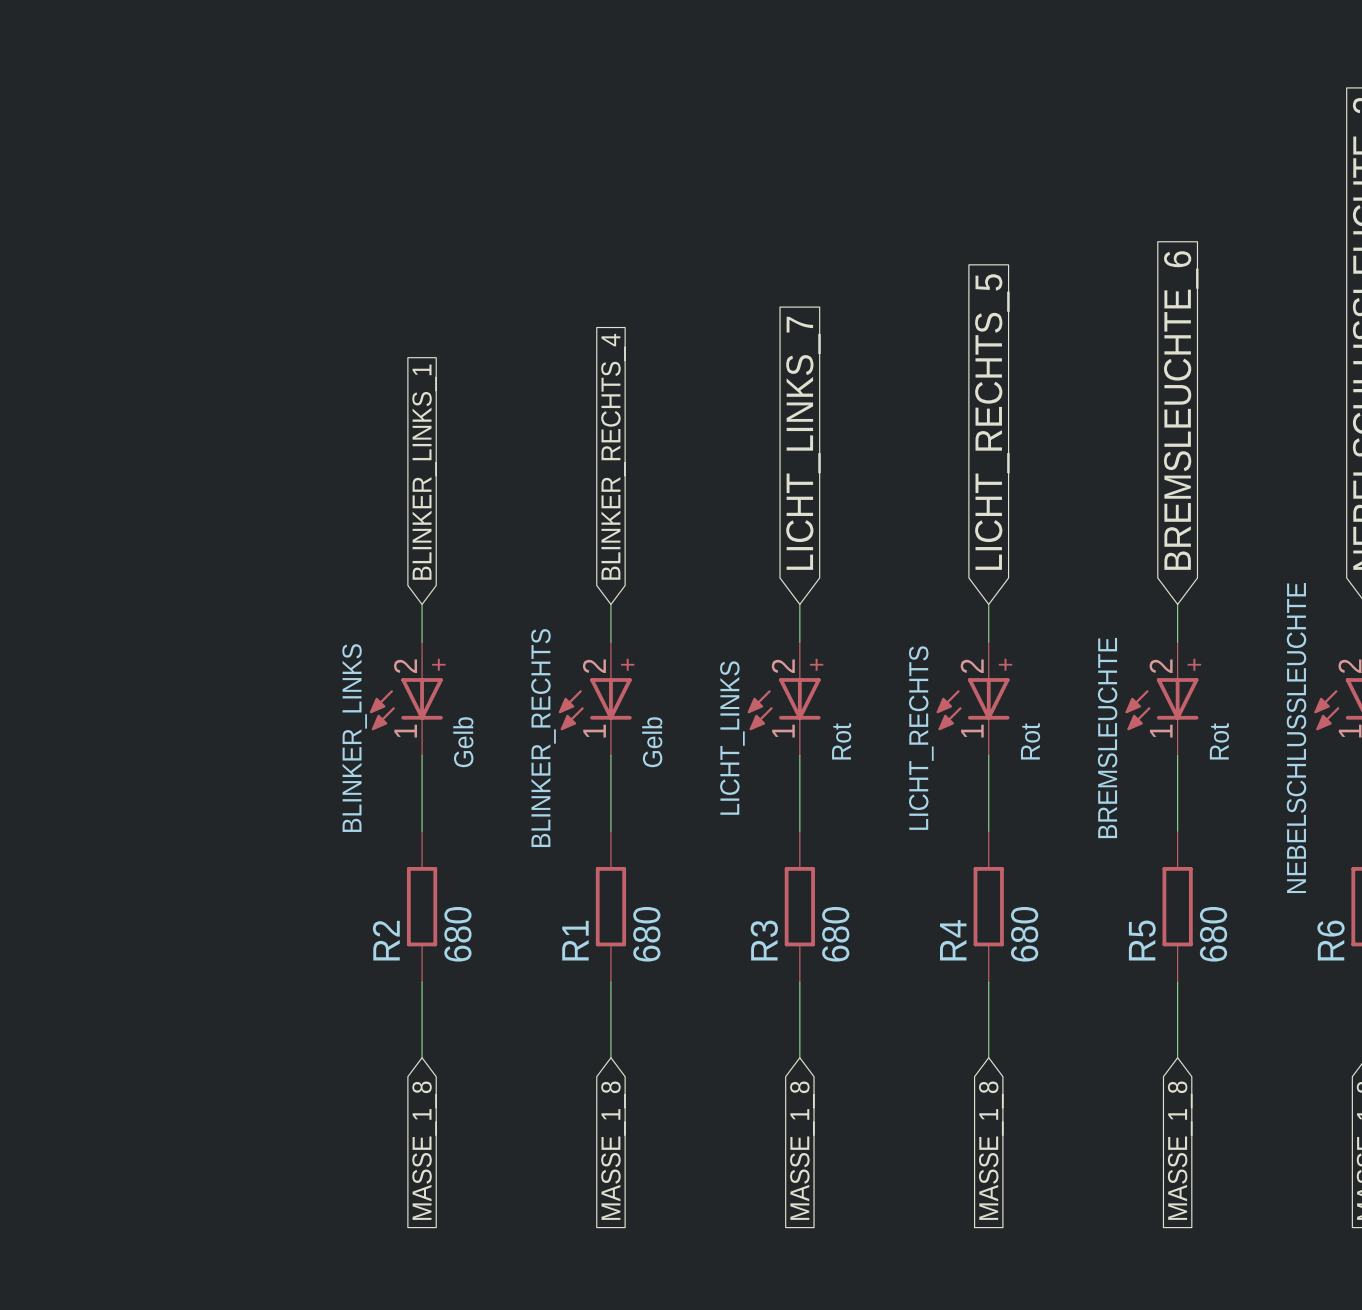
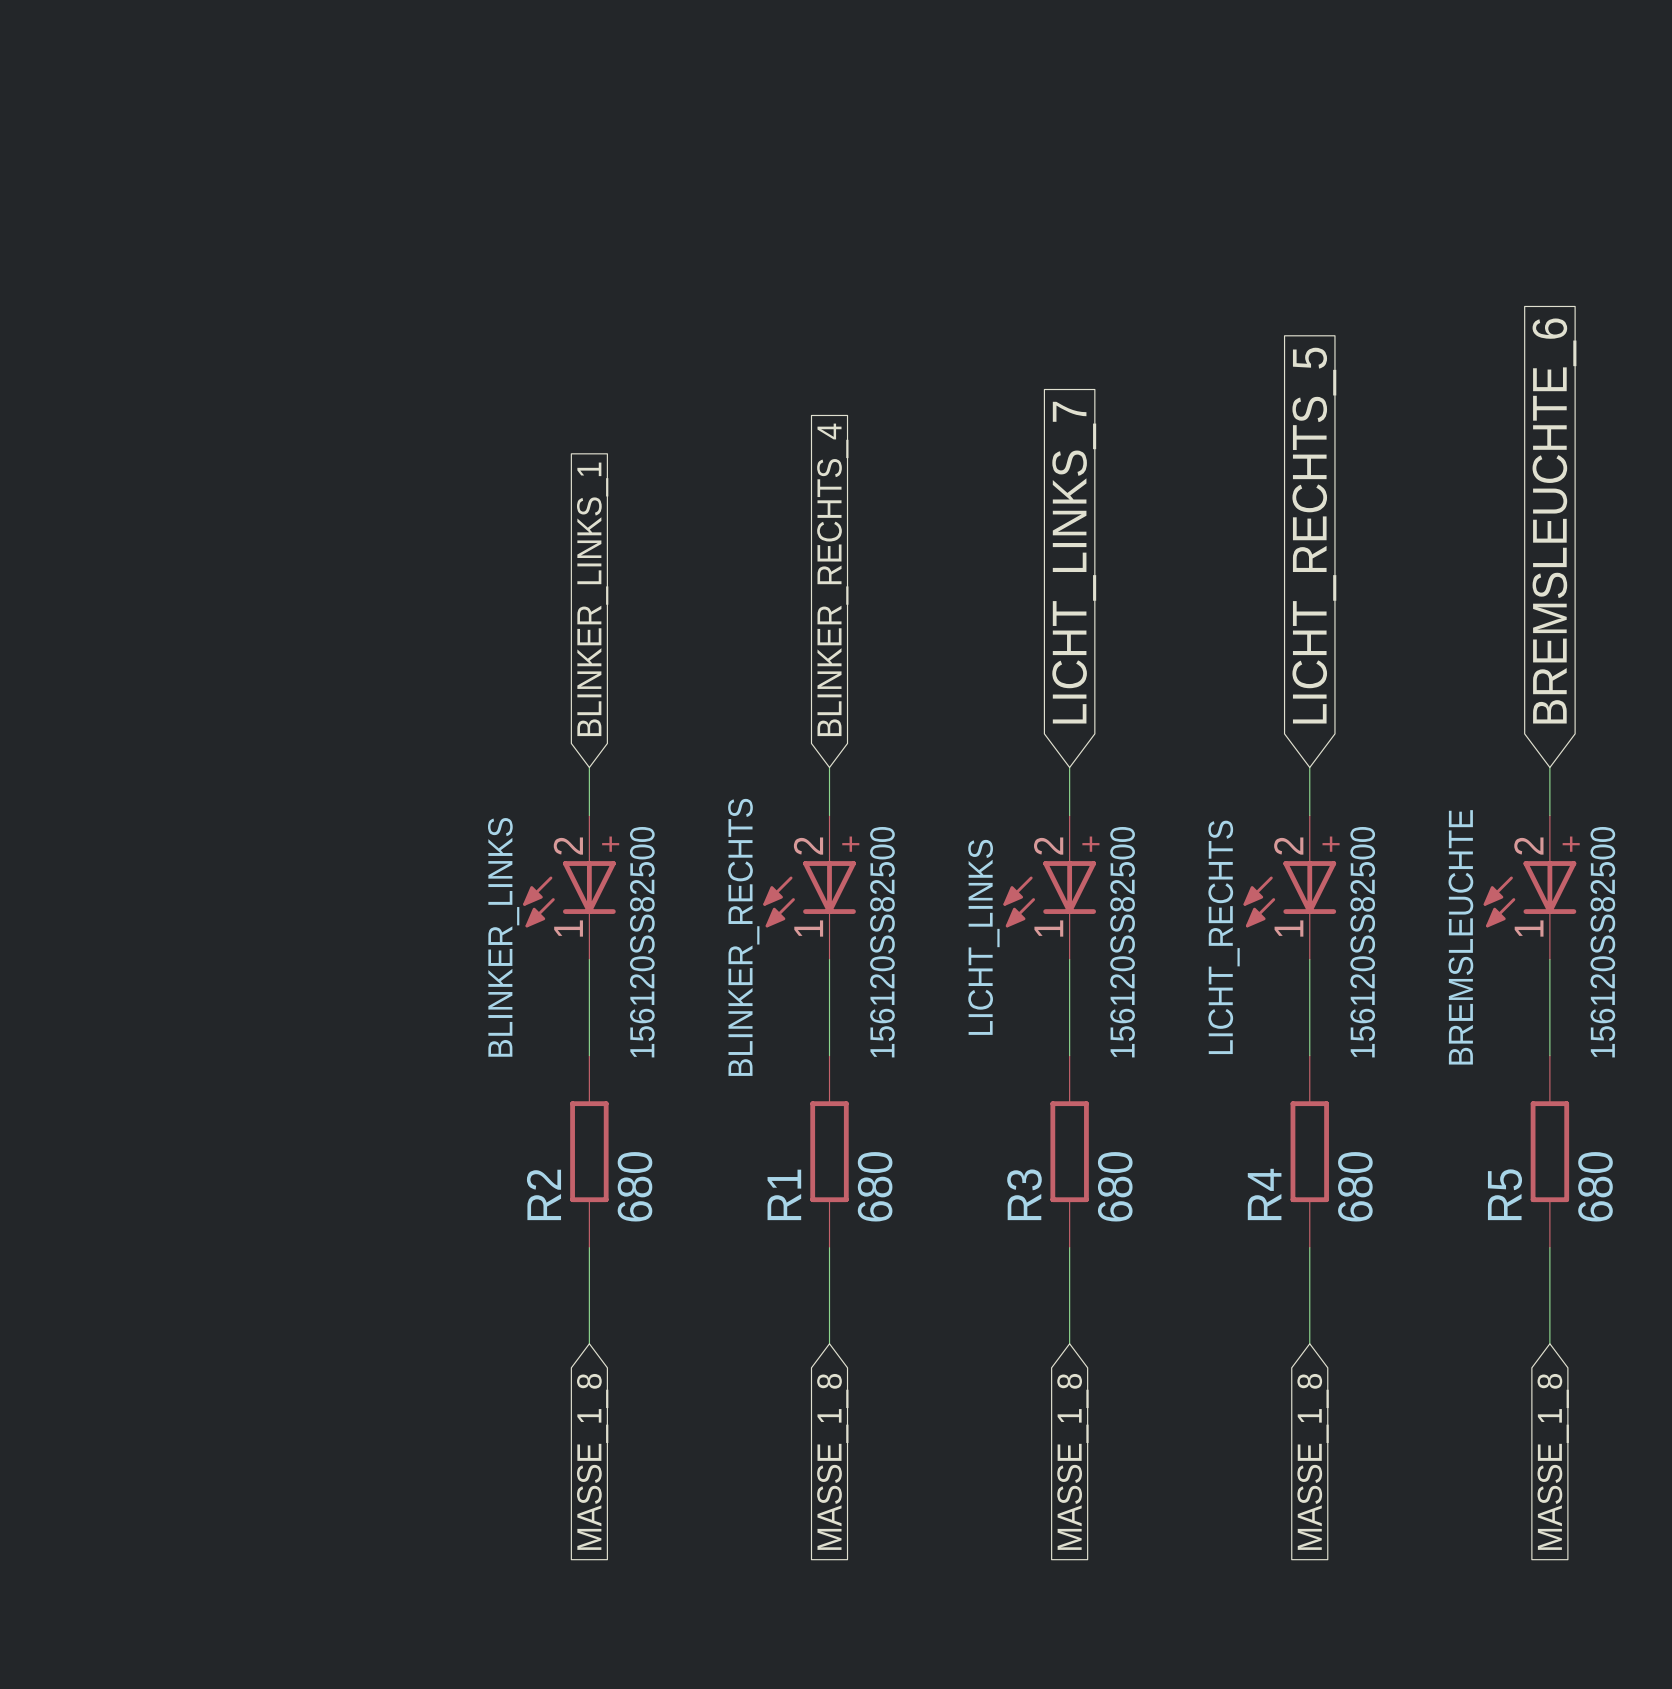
LICHT_LINKS value: Rot (841, 741) -> 156120SS82500 (1122, 942)
LICHT_RECHTS value: Rot (1030, 741) -> 156120SS82500 (1362, 942)
BREMSLEUCHTE value: Rot (1219, 741) -> 156120SS82500 (1602, 942)
BLINKER_LINKS value: Gelb (463, 742) -> 156120SS82500 (642, 942)
BLINKER_RECHTS value: Gelb (652, 742) -> 156120SS82500 (882, 942)

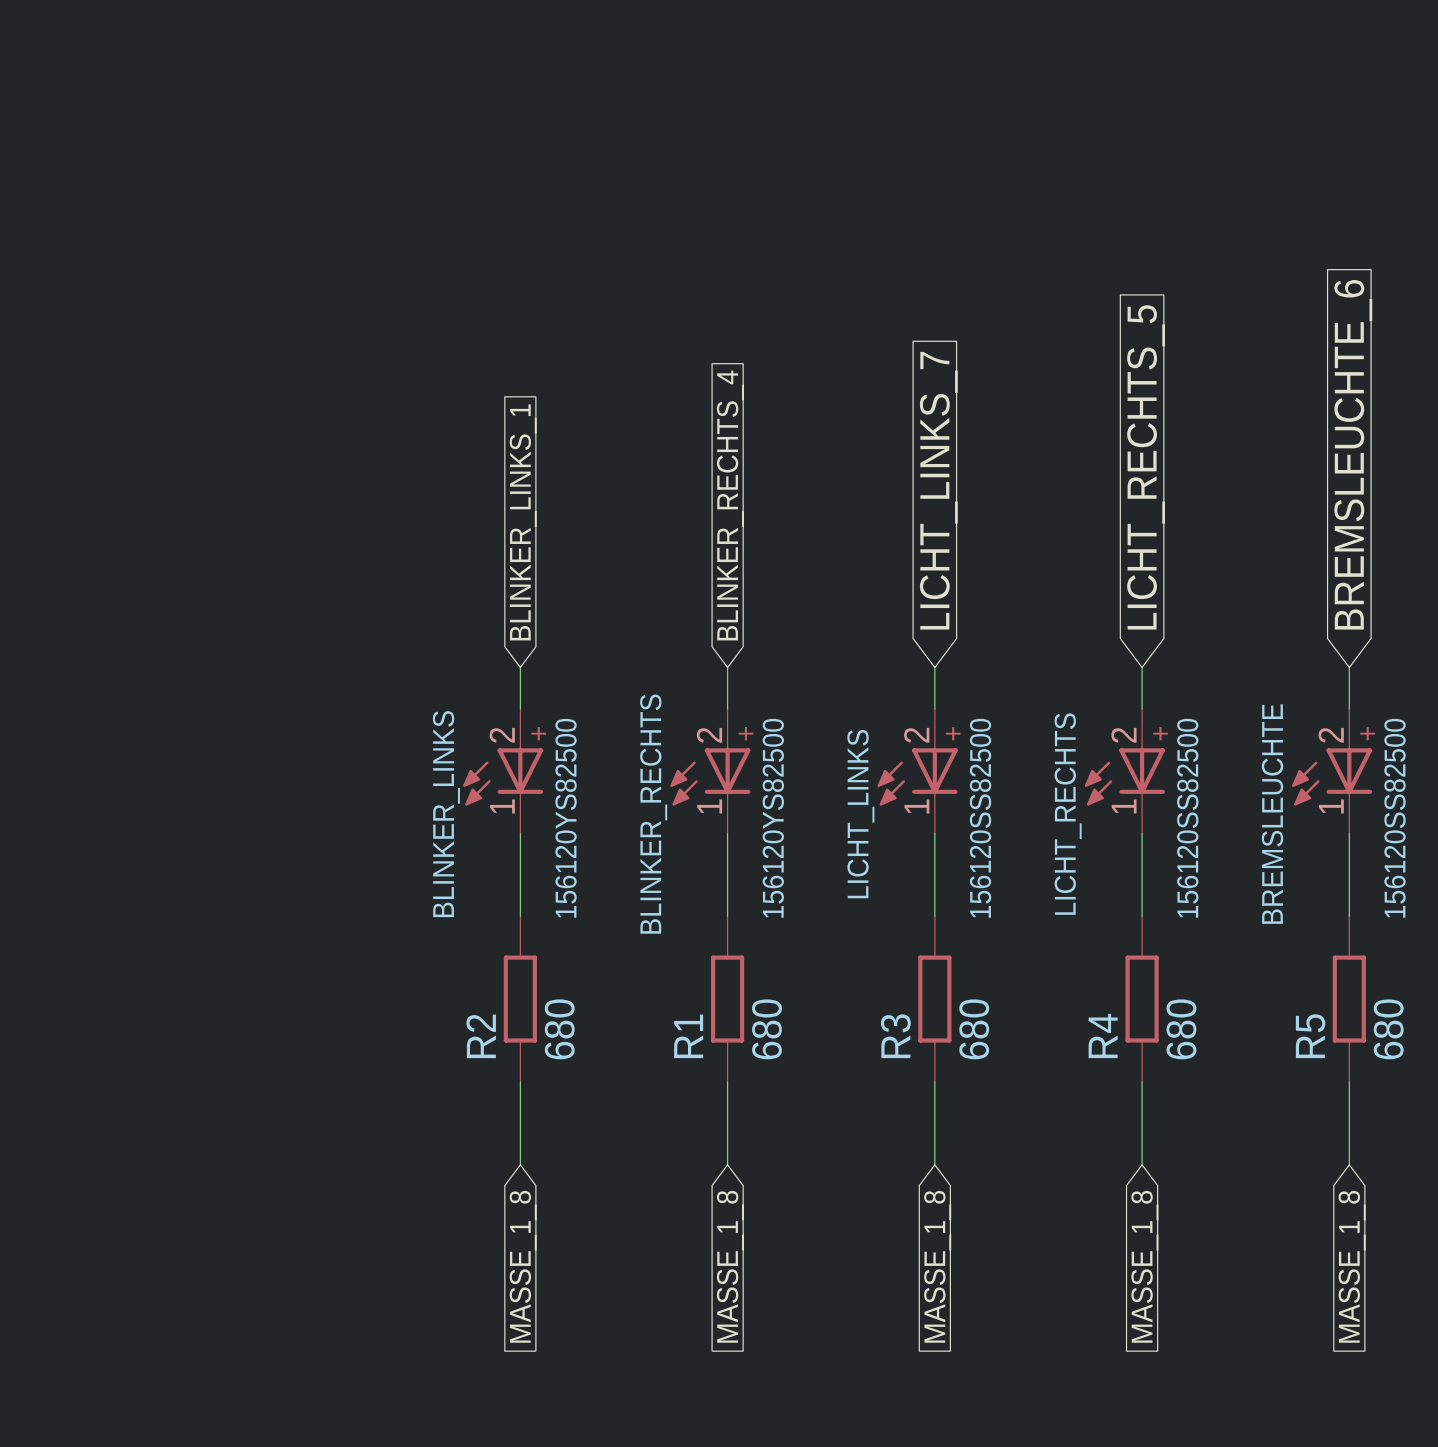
BLINKER_LINKS value: 156120SS82500 (642, 942) -> 156120YS82500 (566, 818)
BLINKER_RECHTS value: 156120SS82500 (882, 942) -> 156120YS82500 (773, 818)

